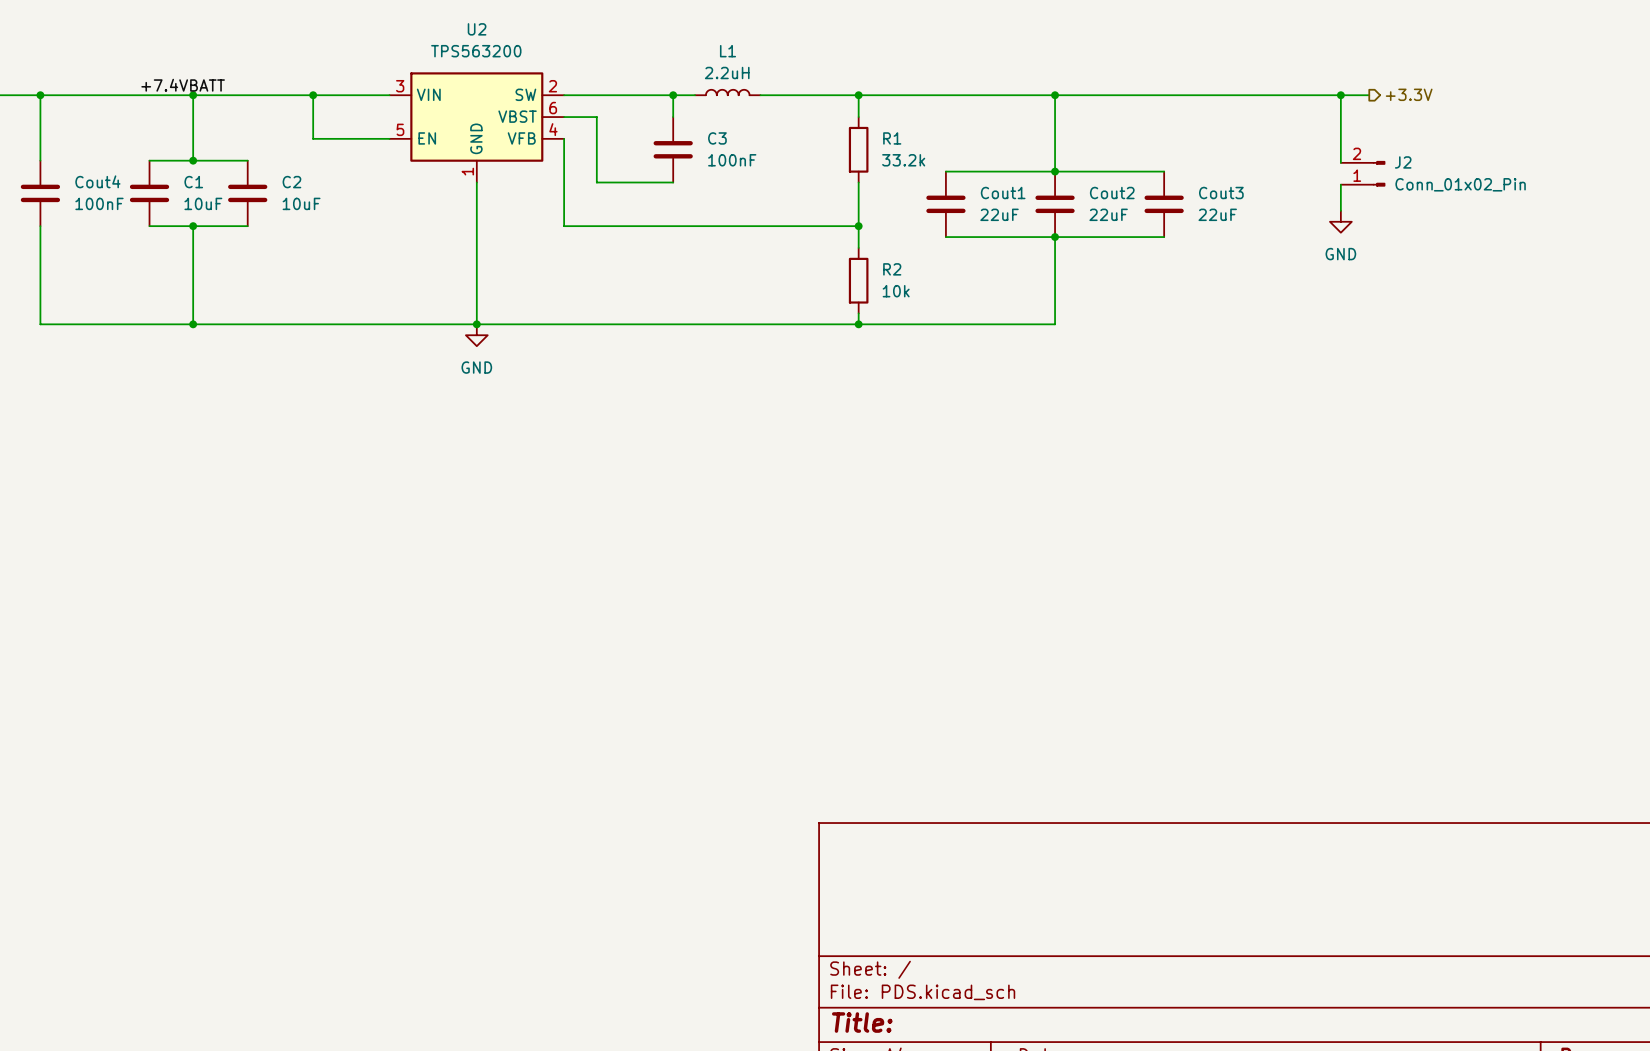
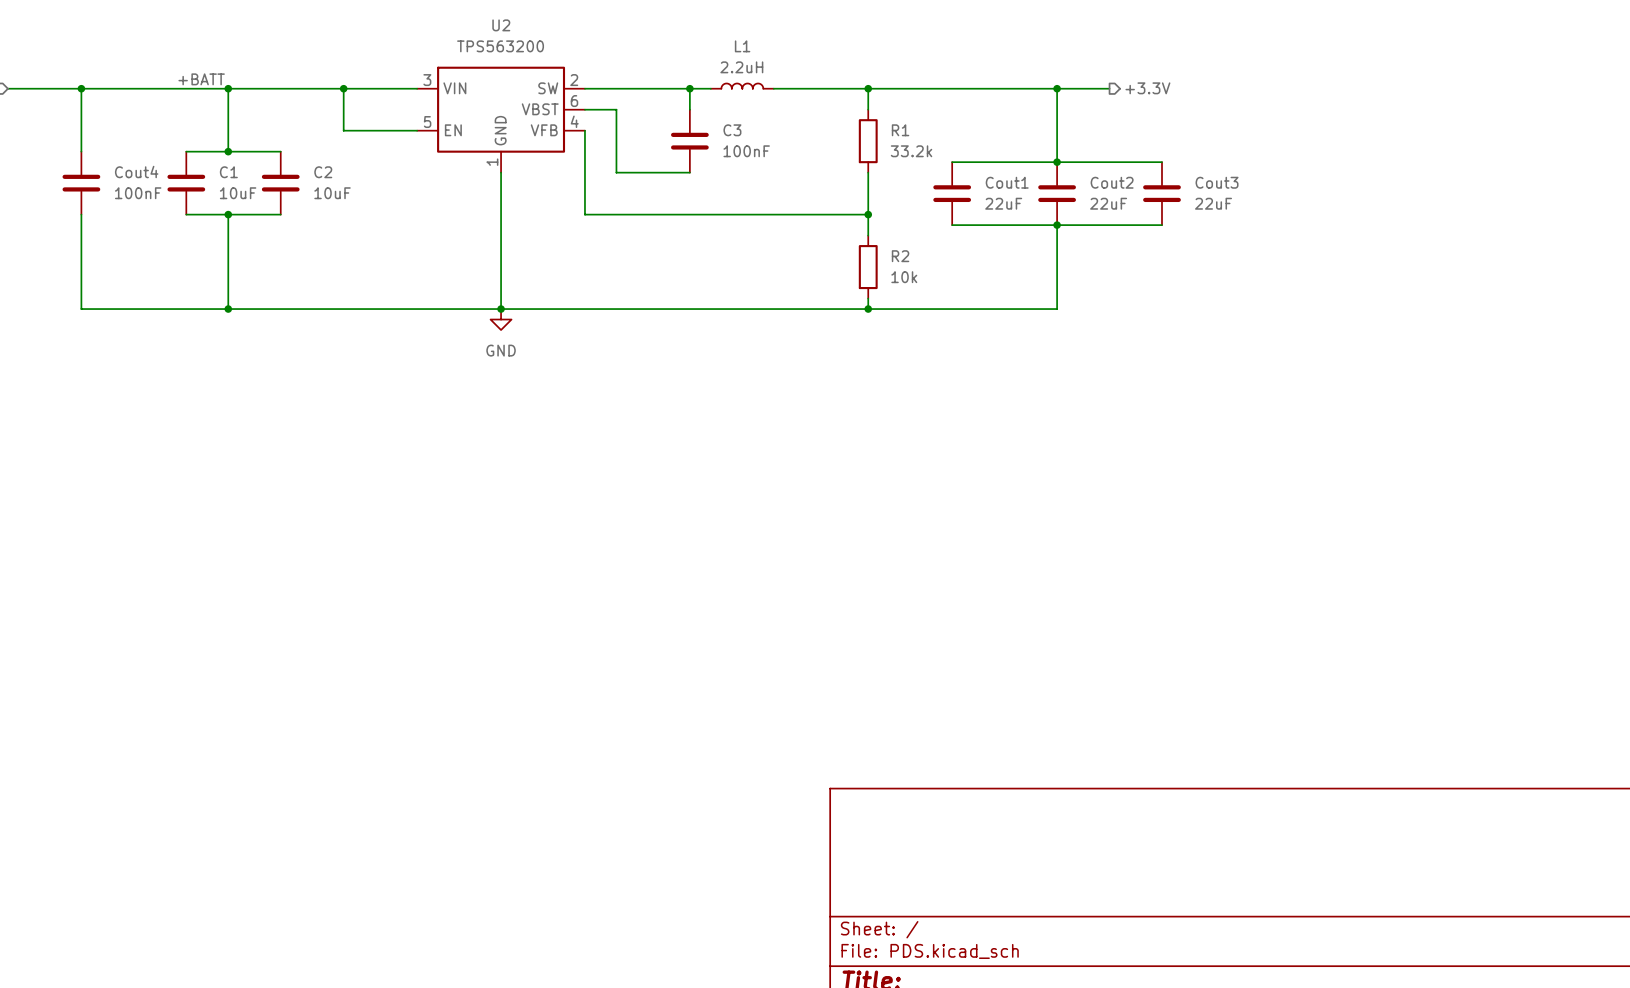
label: +7.4VBATT (183, 85) -> +BATT (201, 79)
hierarchical label: none -> +3.3V (1147, 88)
hierarchical label: +3.3V (1409, 94) -> none
wire: (1109, 95) (1369, 95) -> none
wire: (1340, 95) (1340, 162) -> none
junction: (1340, 95) -> none
J2: Conn_01x02_Pin (1363, 173) -> none
wire: (1340, 184) (1340, 210) -> none
power symbol: GND (1340, 221) -> none

